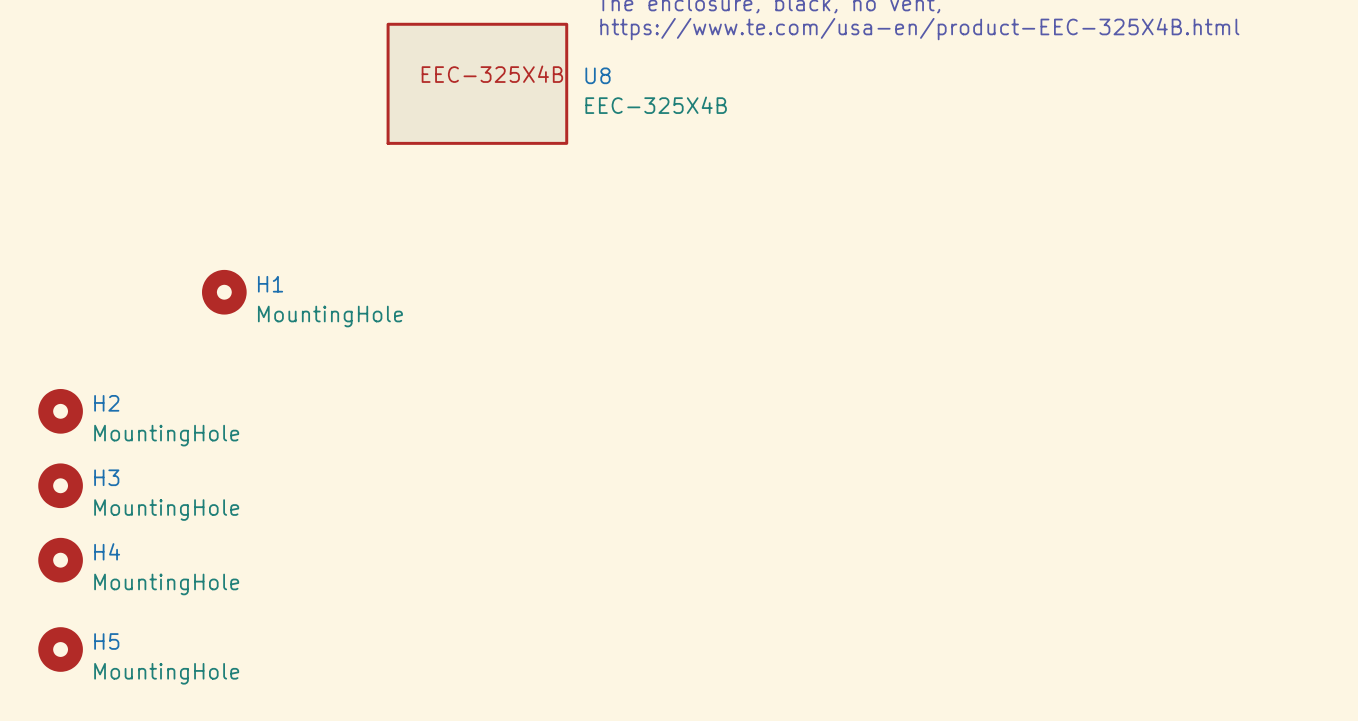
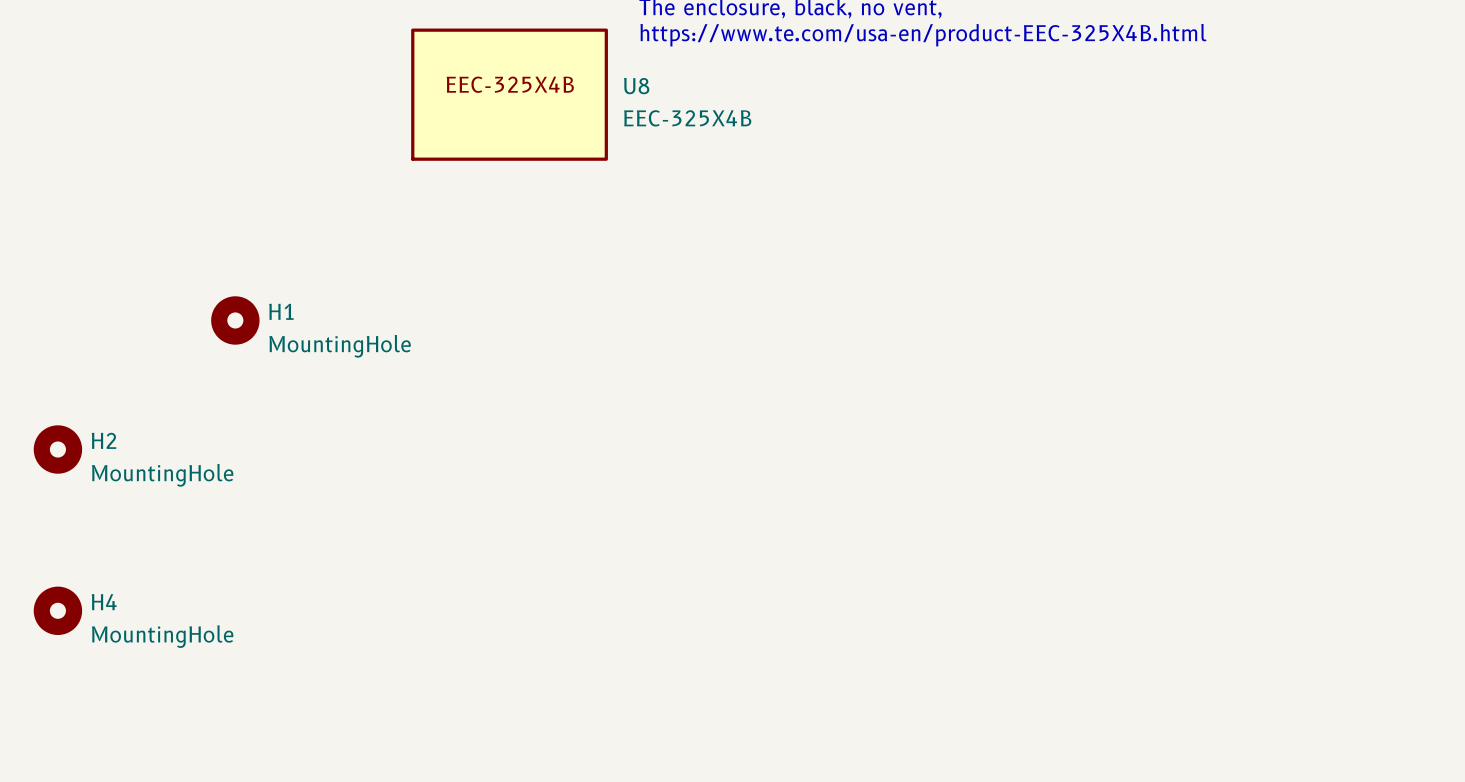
H3: MountingHole (60, 485) -> none
H5: MountingHole (60, 649) -> none

